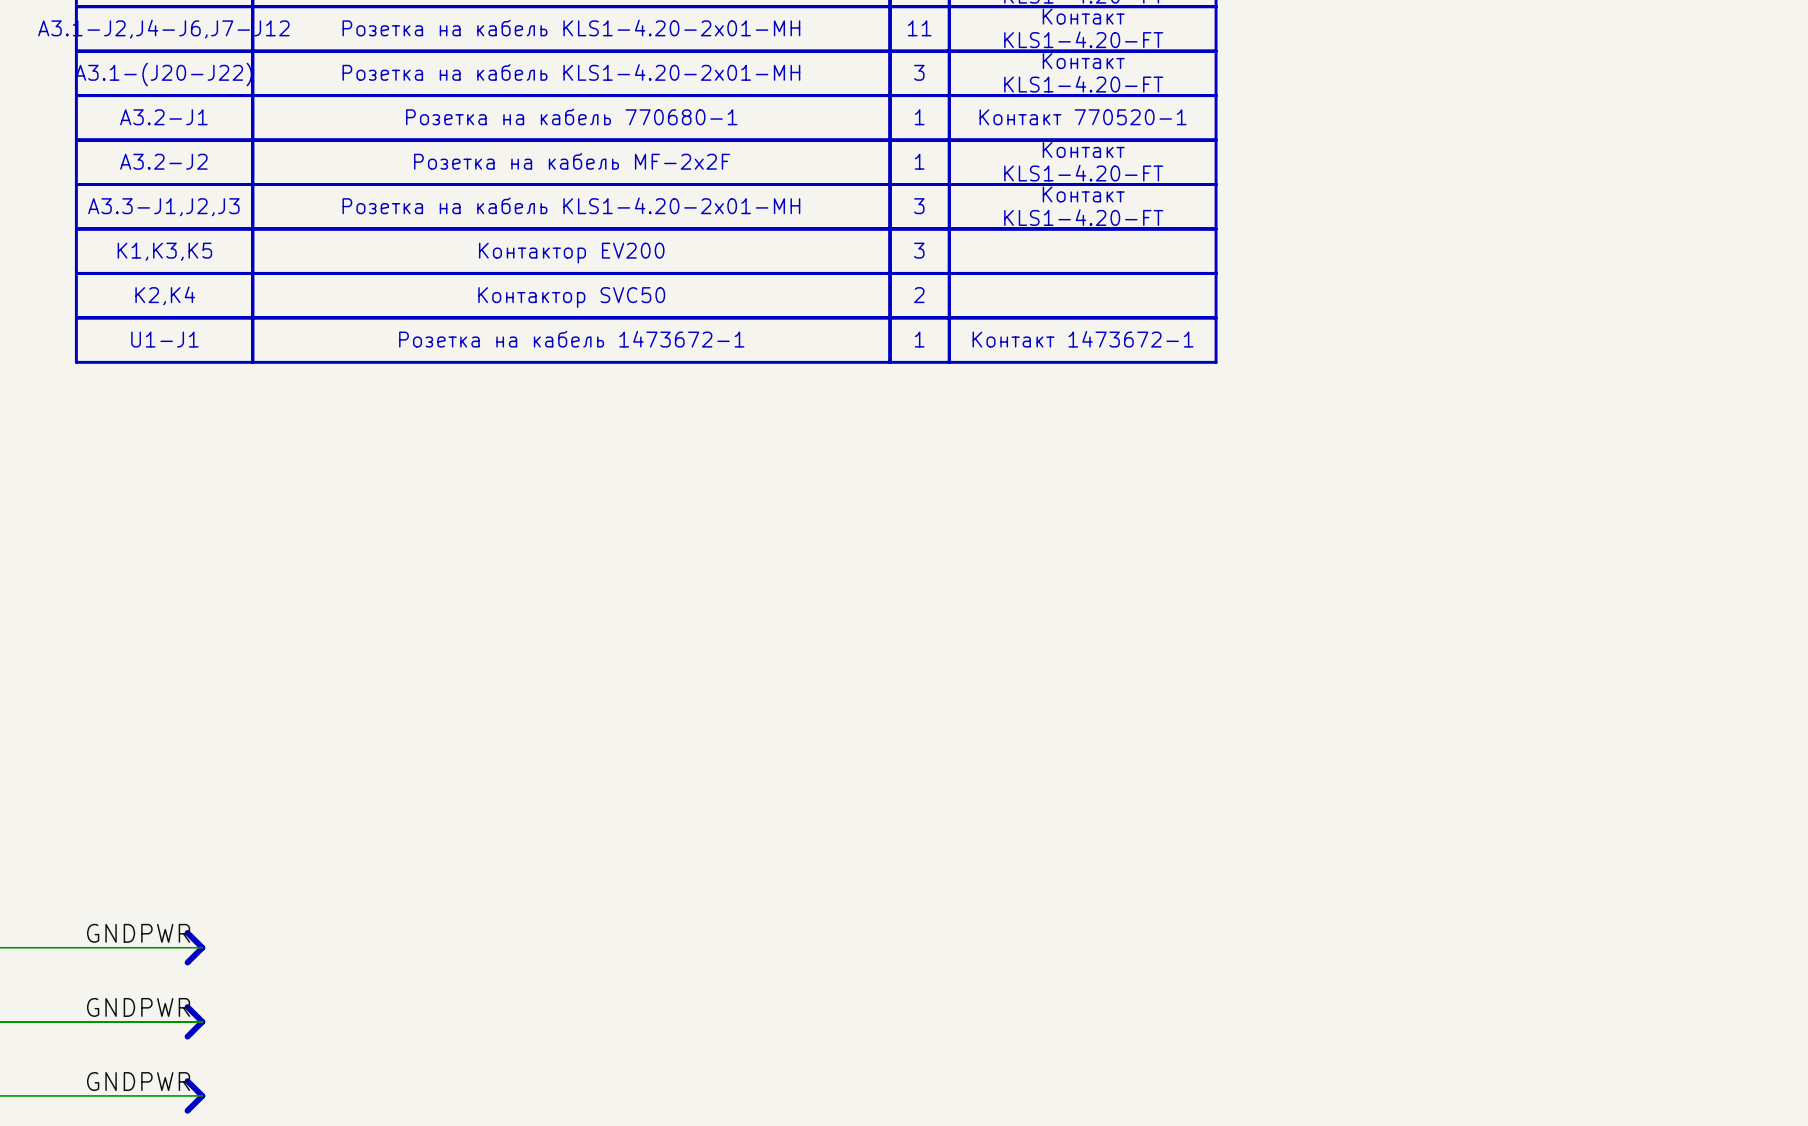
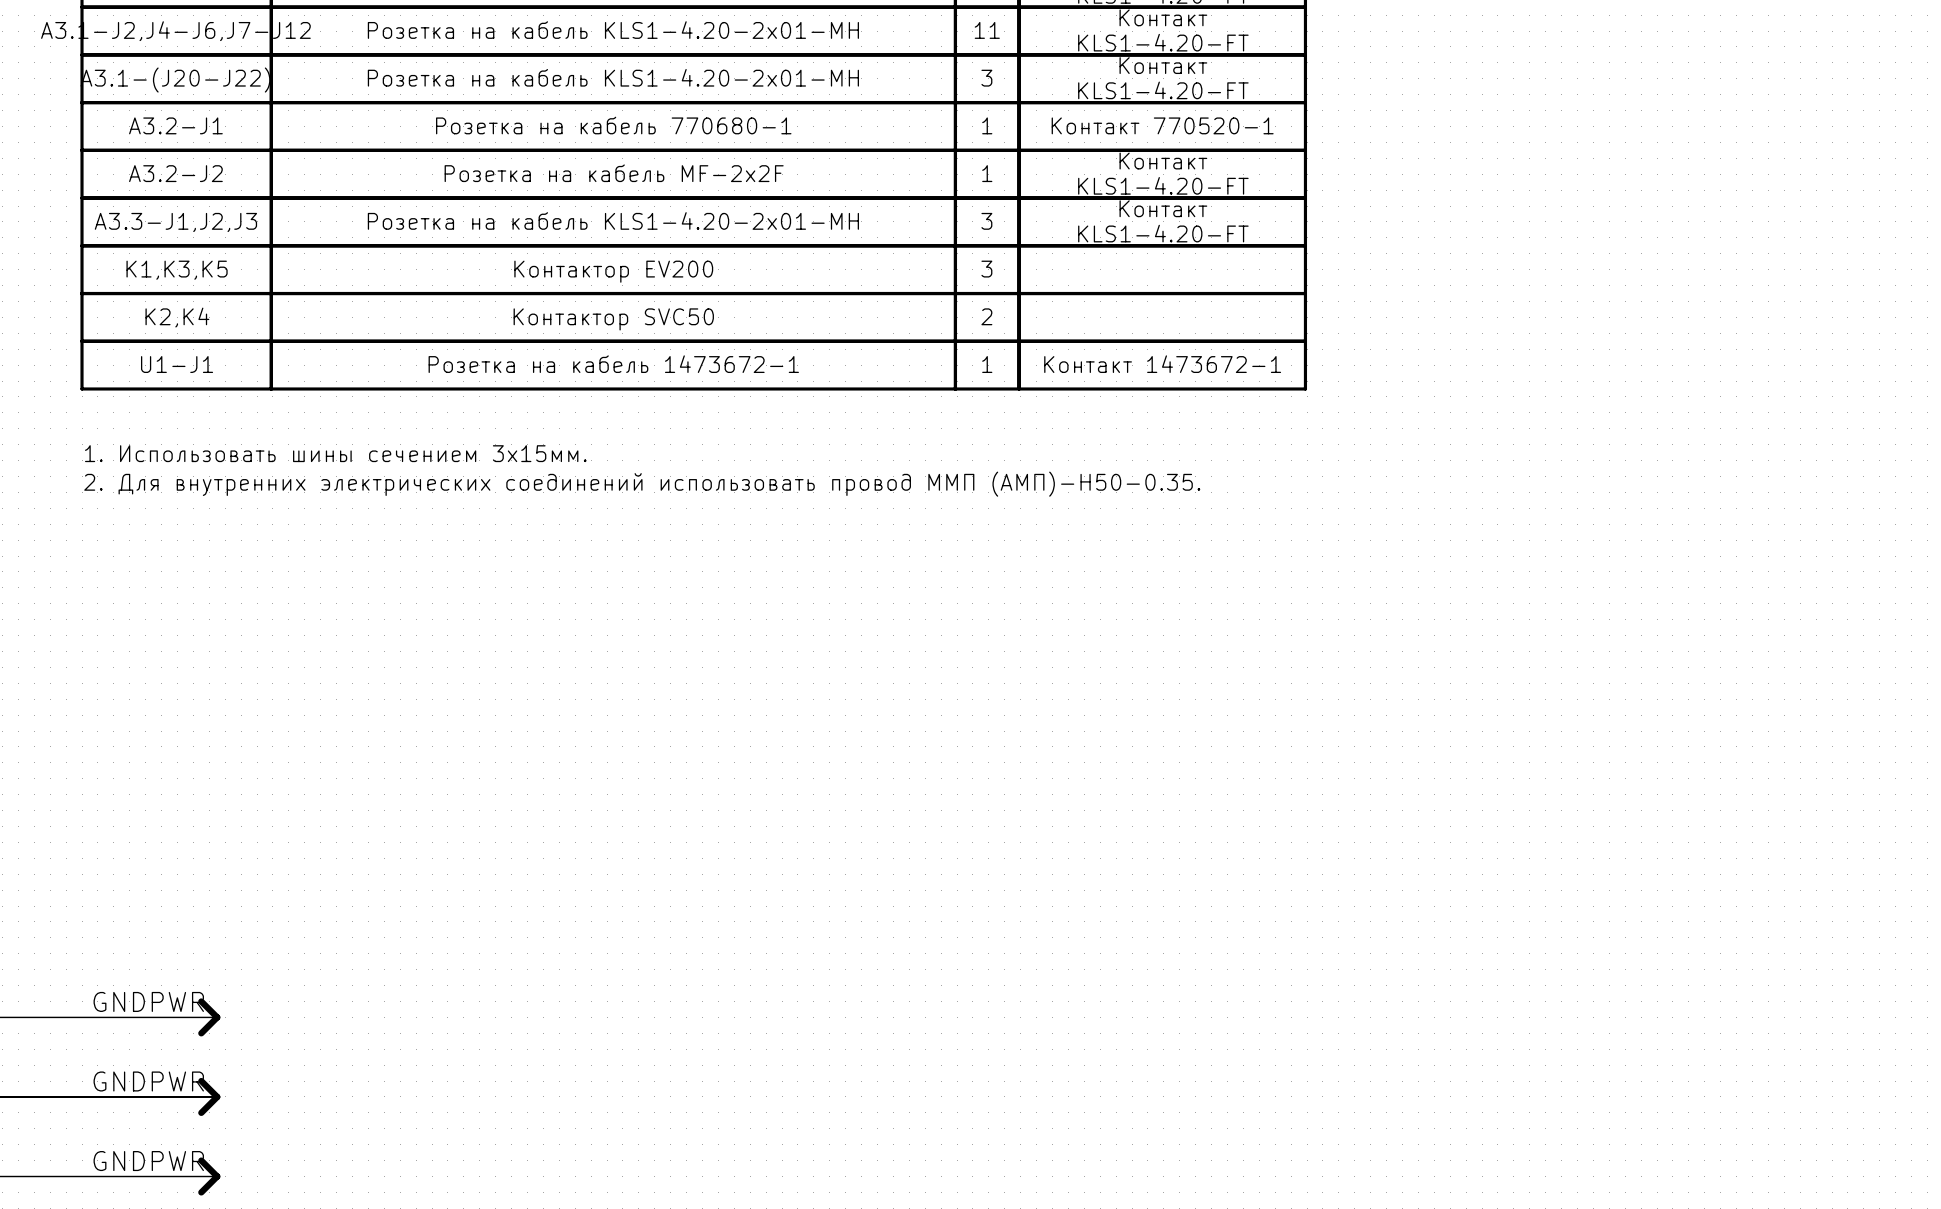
text: none -> 1. Использовать шины сечением 3х15мм. (335, 453)
text: none -> 2. Для внутренних электрических соединений использовать провод ММП (АМП)-H50-0.35. (642, 484)

